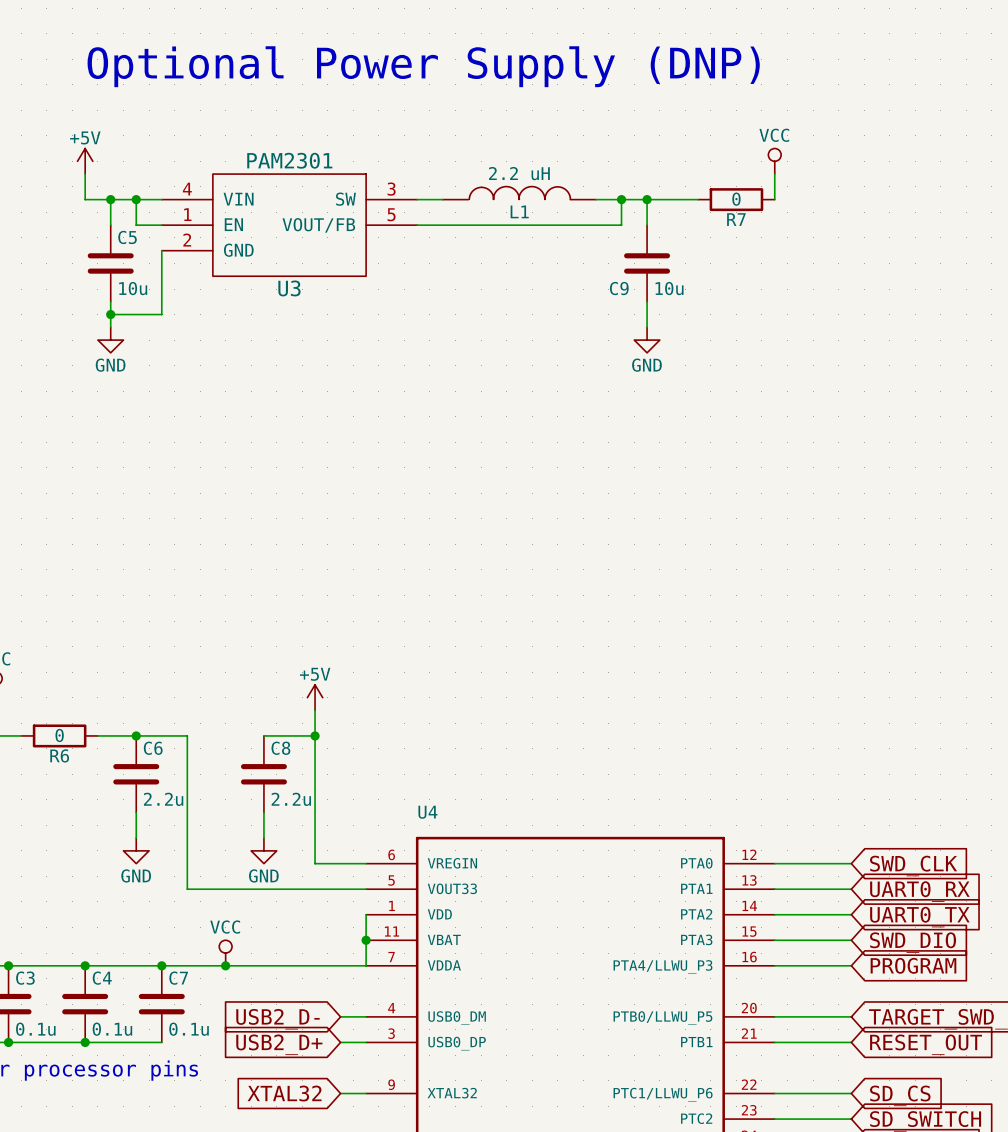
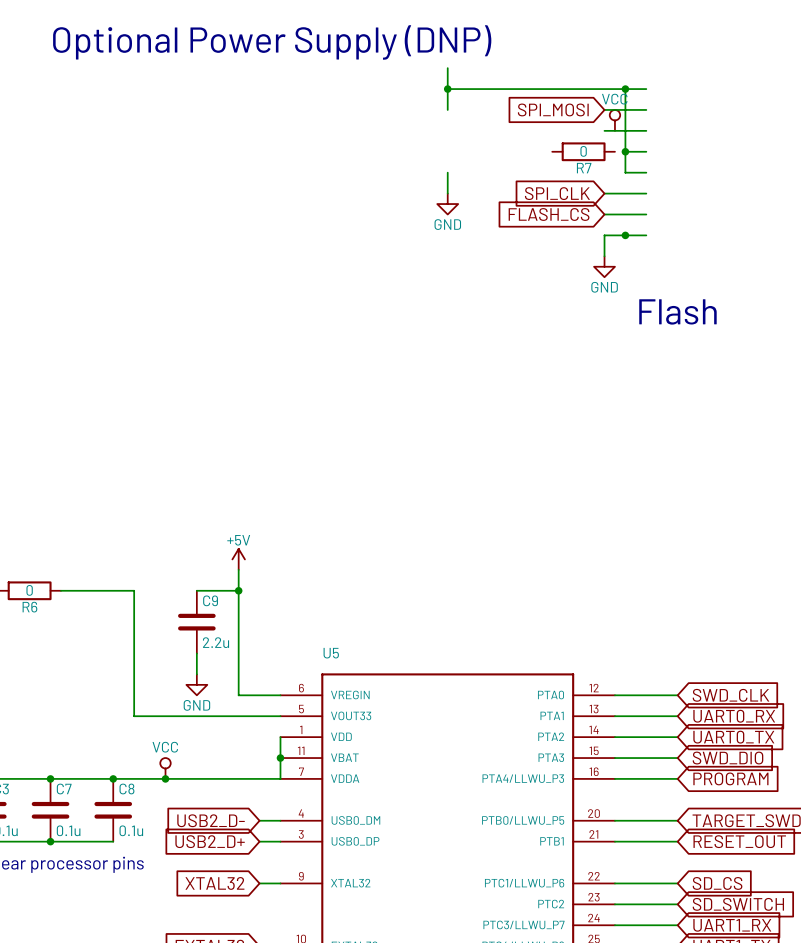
wire: none -> (447, 68) (447, 109)
wire: none -> (447, 89) (646, 89)
junction: none -> (447, 89)
wire: none -> (625, 89) (625, 172) (646, 172)
junction: none -> (625, 89)
wire: none -> (604, 109) (646, 109)
global label: none -> SPI_MOSI (553, 109)
power symbol: +5V (85, 161) -> none
wire: (85, 174) (85, 199) (161, 199) -> none
wire: none -> (604, 130) (646, 130)
wire: (774, 174) (774, 199) -> none
L1: 2.2 uH (519, 193) -> none
wire: (110, 199) (110, 225) -> none
junction: (110, 199) -> none
wire: (136, 199) (136, 225) (161, 225) -> none
junction: (136, 199) -> none
wire: (417, 199) (442, 199) -> none
wire: (595, 199) (698, 199) -> none
wire: (621, 199) (621, 225) (417, 225) -> none
junction: (621, 199) -> none
wire: (647, 199) (647, 225) -> (447, 172) (447, 193)
junction: (647, 199) -> none
wire: none -> (625, 151) (646, 151)
junction: none -> (625, 151)
U3: PAM2301 (289, 225) -> none
wire: (161, 250) (161, 314) (110, 314) -> none
wire: none -> (604, 193) (646, 193)
global label: none -> SPI_CLK (557, 193)
C5: 10u (110, 263) -> none
power symbol: none -> GND (447, 204)
C9: 10u (647, 263) -> none
wire: none -> (604, 214) (646, 214)
global label: none -> FLASH_CS (549, 214)
wire: (110, 301) (110, 327) -> none
wire: (647, 301) (647, 327) -> none
junction: none -> (625, 235)
wire: none -> (646, 235) (604, 235) (604, 256)
junction: (110, 314) -> none
power symbol: GND (110, 340) -> none
power symbol: GND (647, 340) -> none
power symbol: none -> GND (604, 266)
text: none -> Flash (677, 311)
junction: (136, 735) -> none
C8 name: C8 (280, 748) -> C9 (210, 600)
C6: 2.2u (136, 774) -> none
wire: (136, 812) (136, 838) -> none
U4 name: U4 (427, 812) -> U5 (331, 653)
power symbol: GND (136, 850) -> none
C4 name: C4 (102, 978) -> C7 (64, 789)
C7 name: C7 (178, 978) -> C8 (126, 788)

